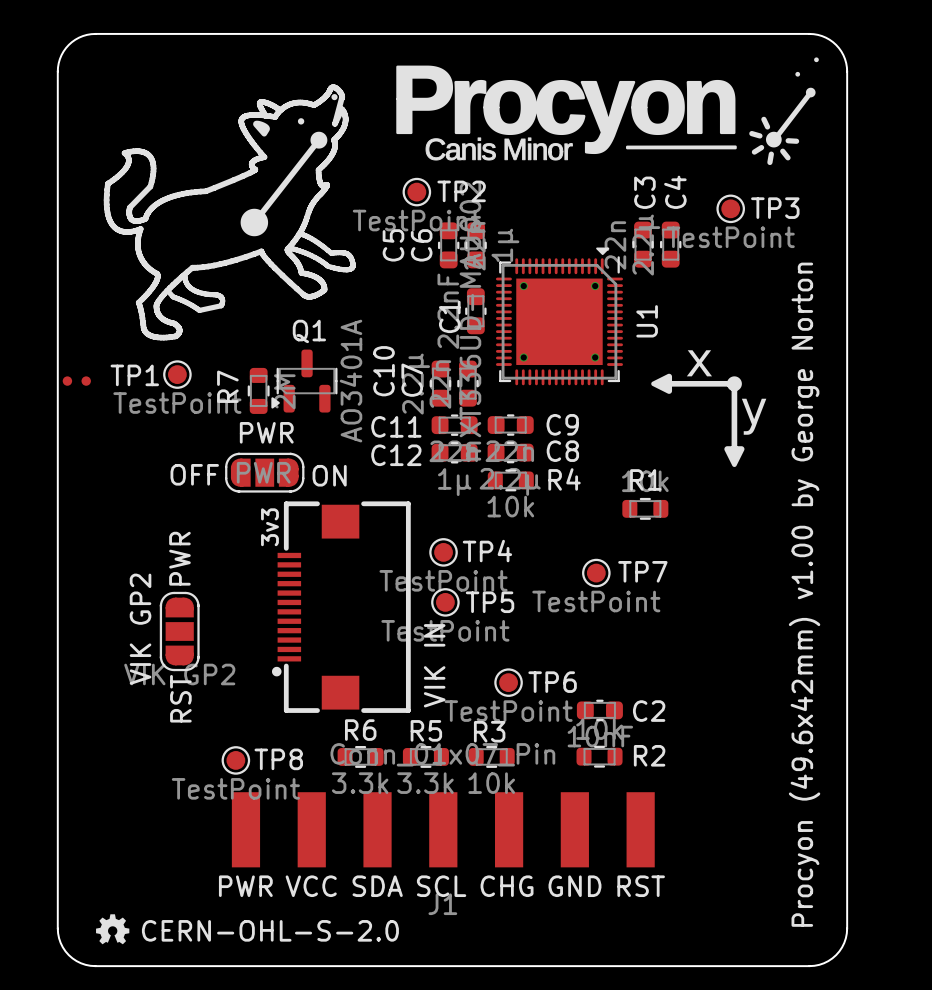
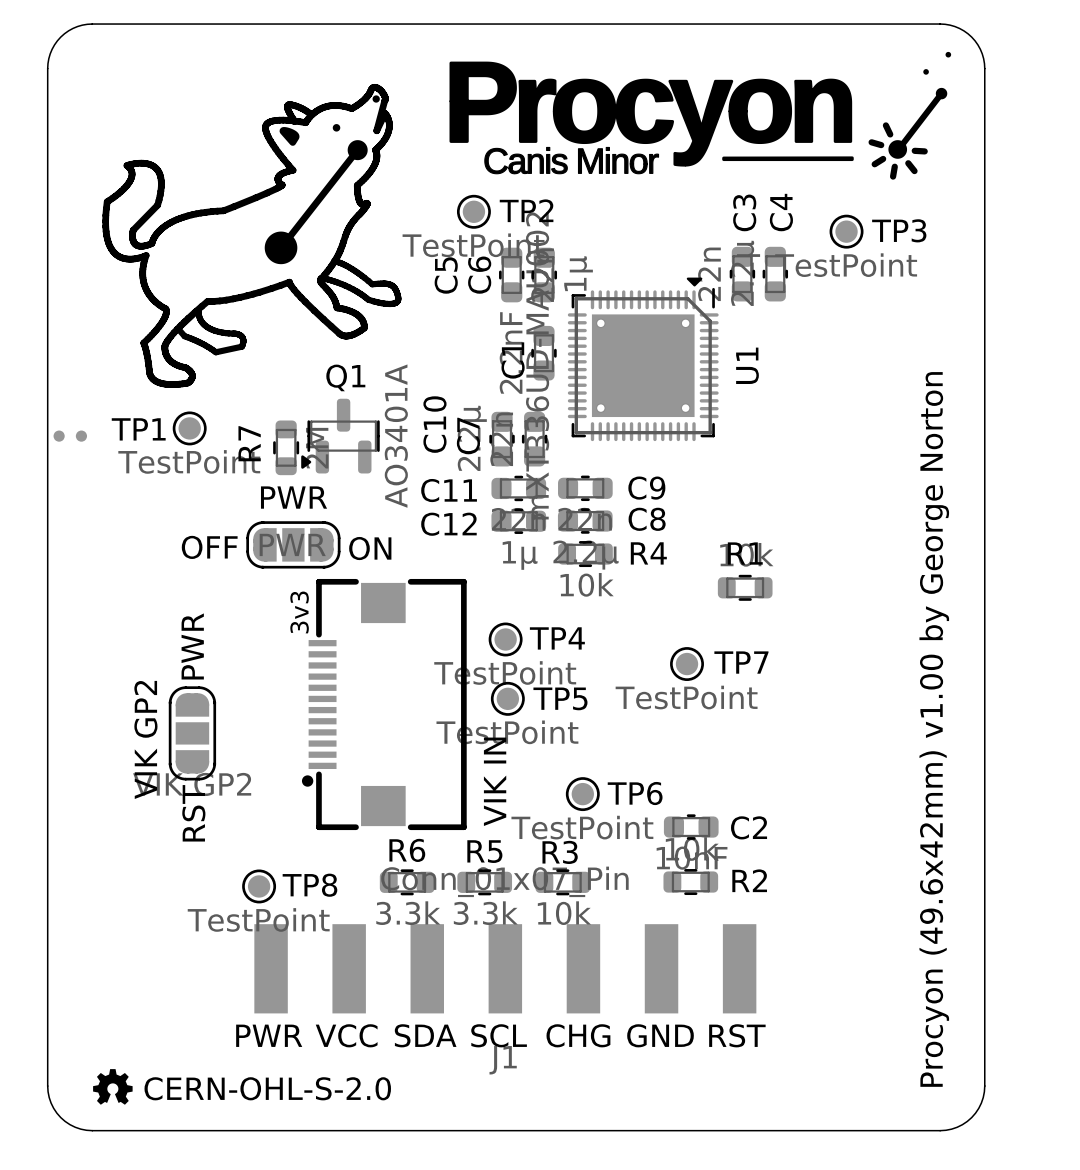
drawing: [651, 350, 767, 467] -> none

